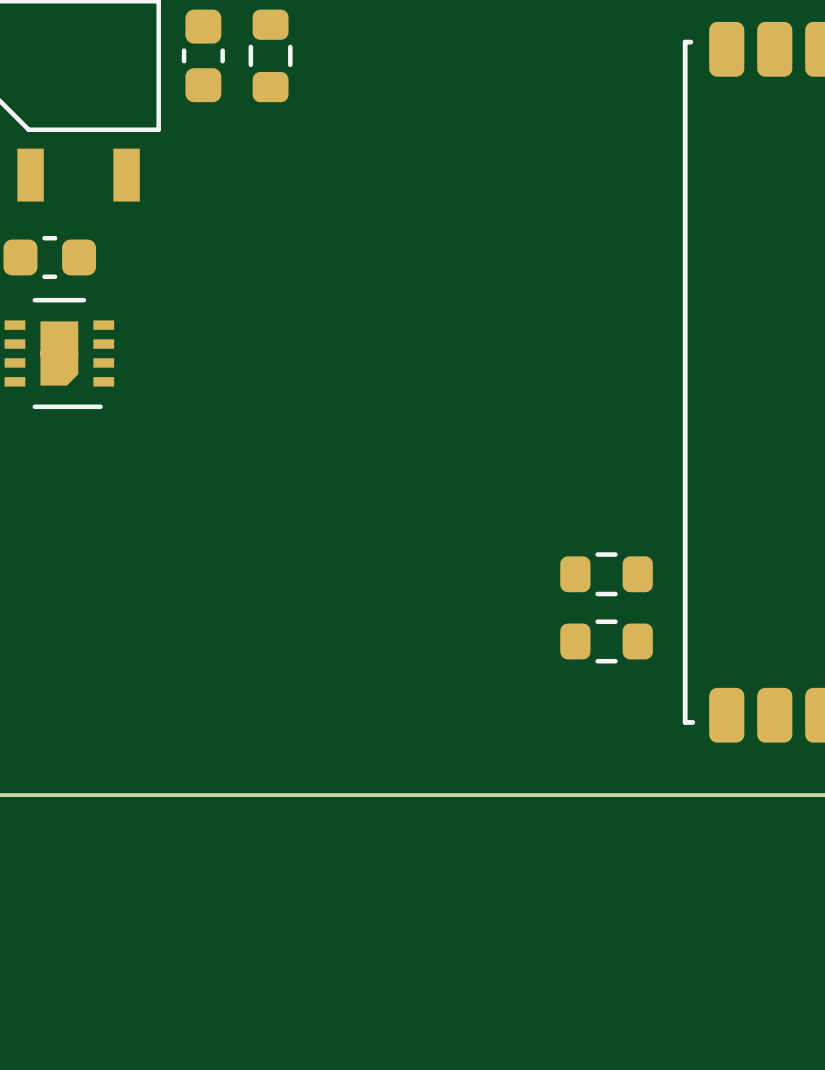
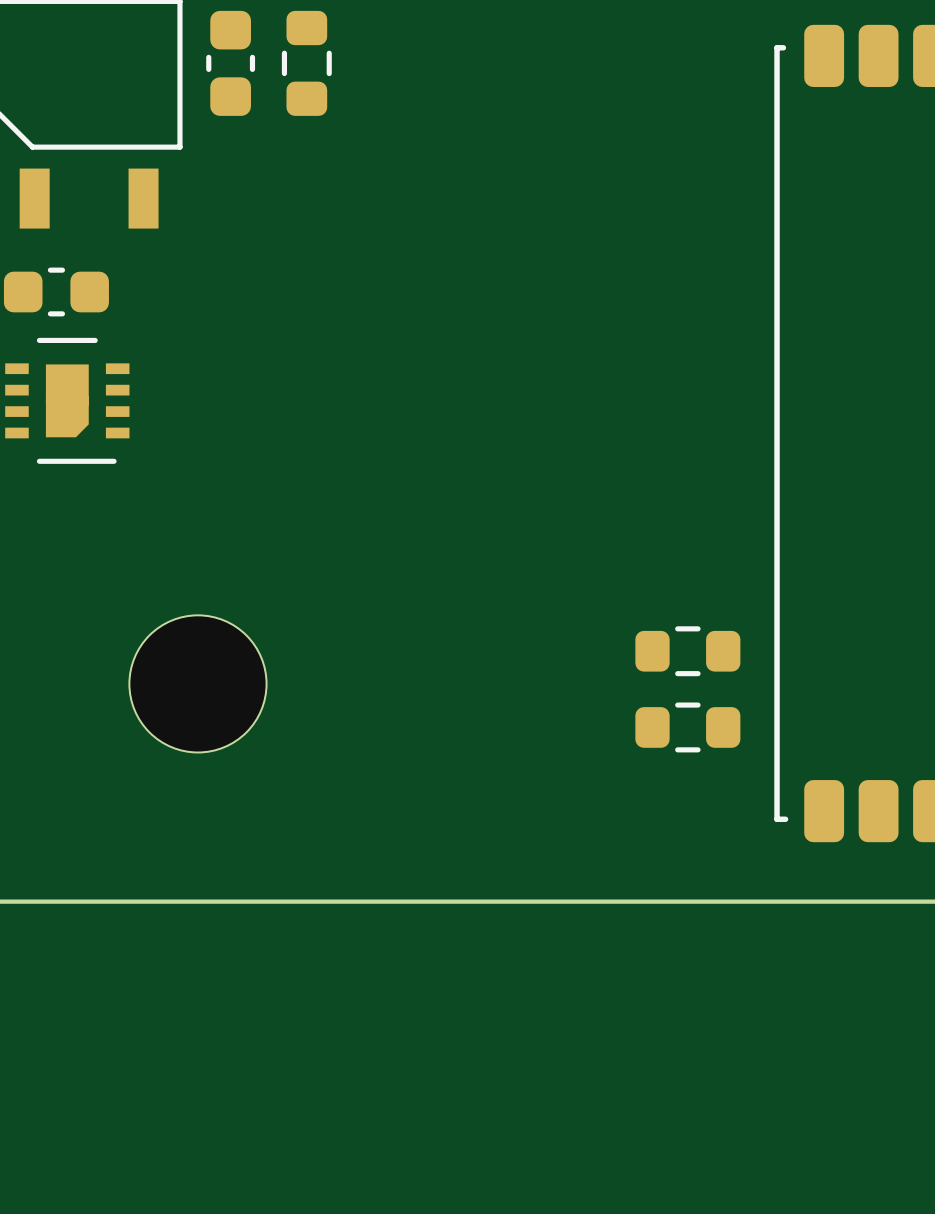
part: none -> (197, 683)

